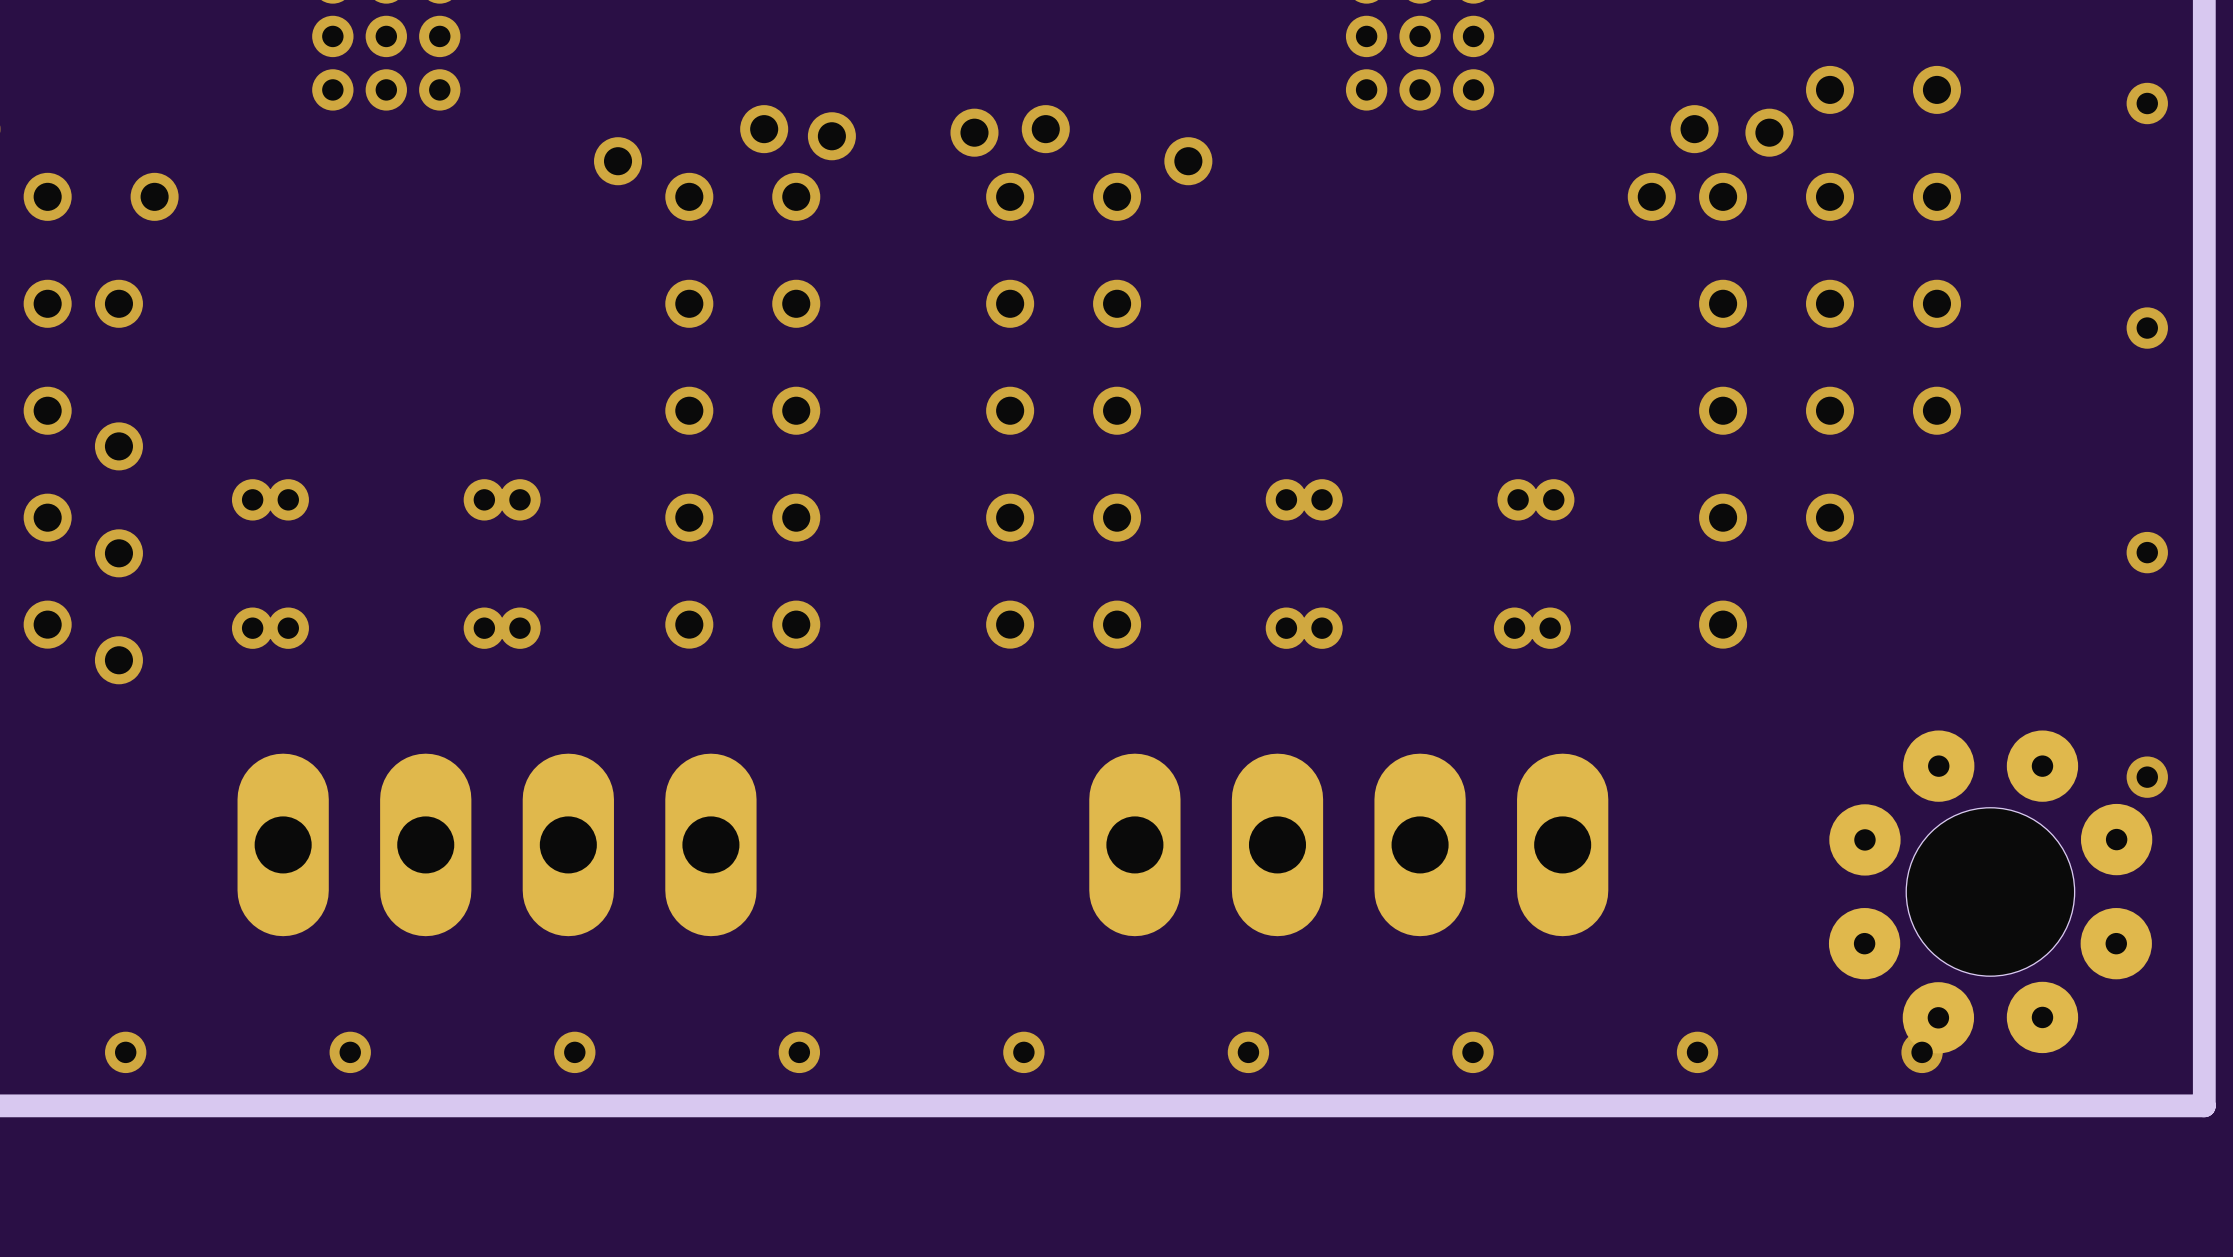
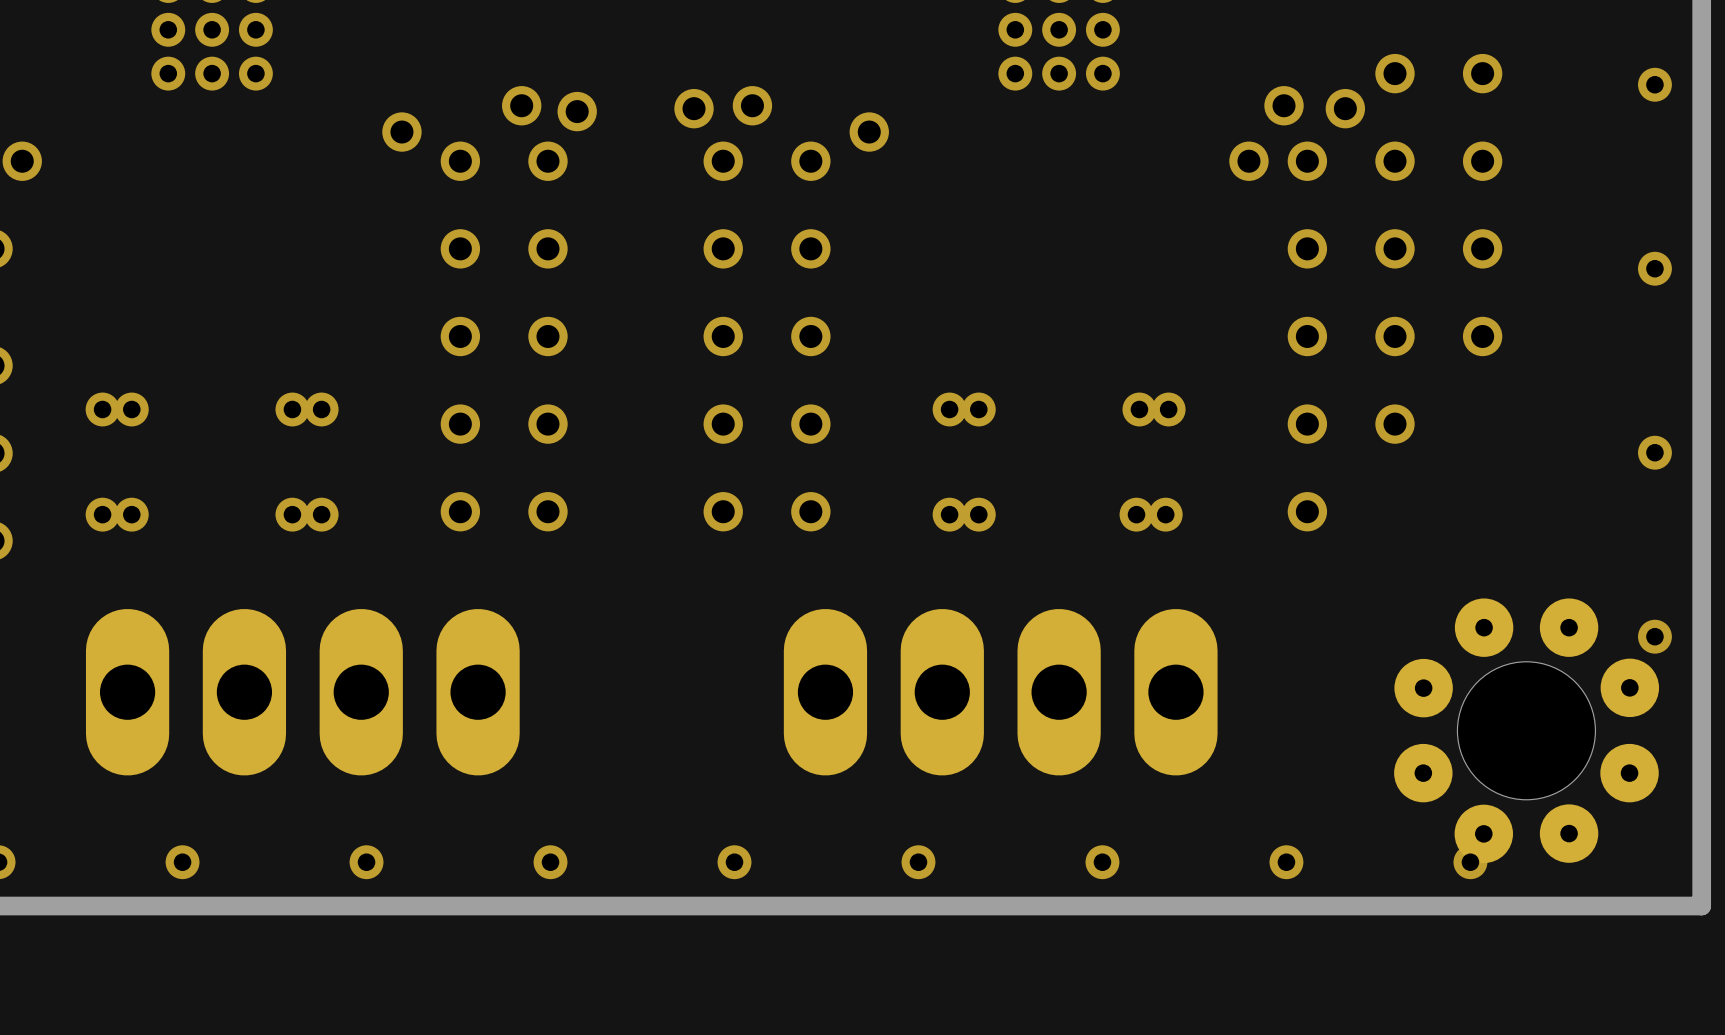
part footprint: [237, 753, 757, 937] -> [85, 608, 520, 776]
part footprint: [1089, 753, 1609, 937] -> [783, 608, 1218, 776]

